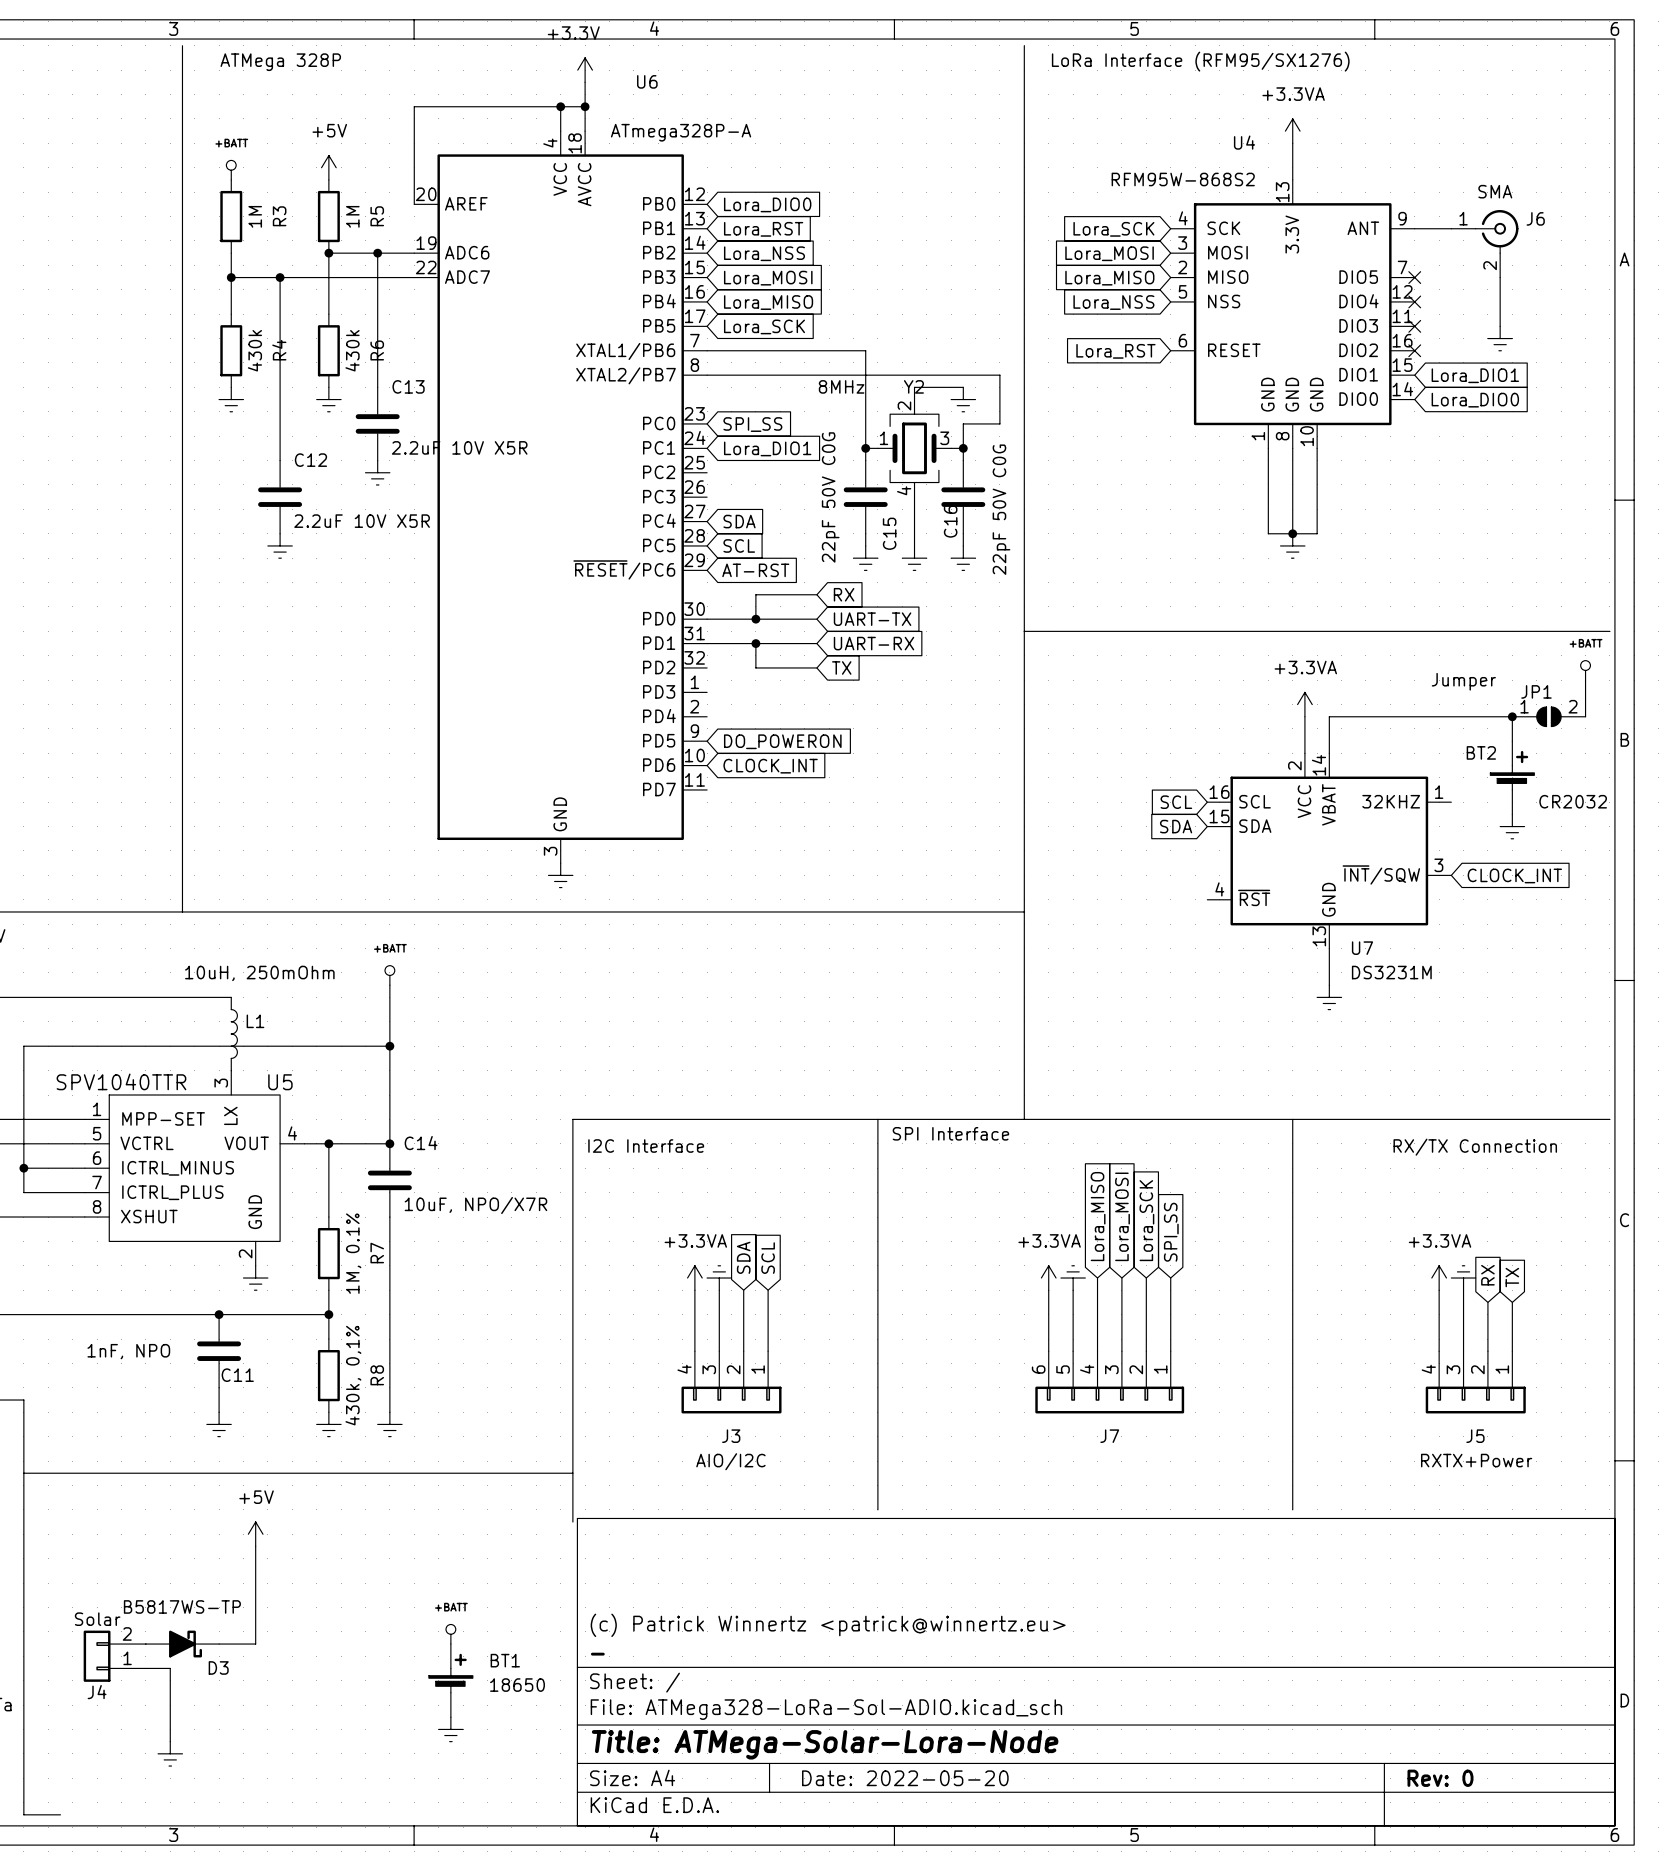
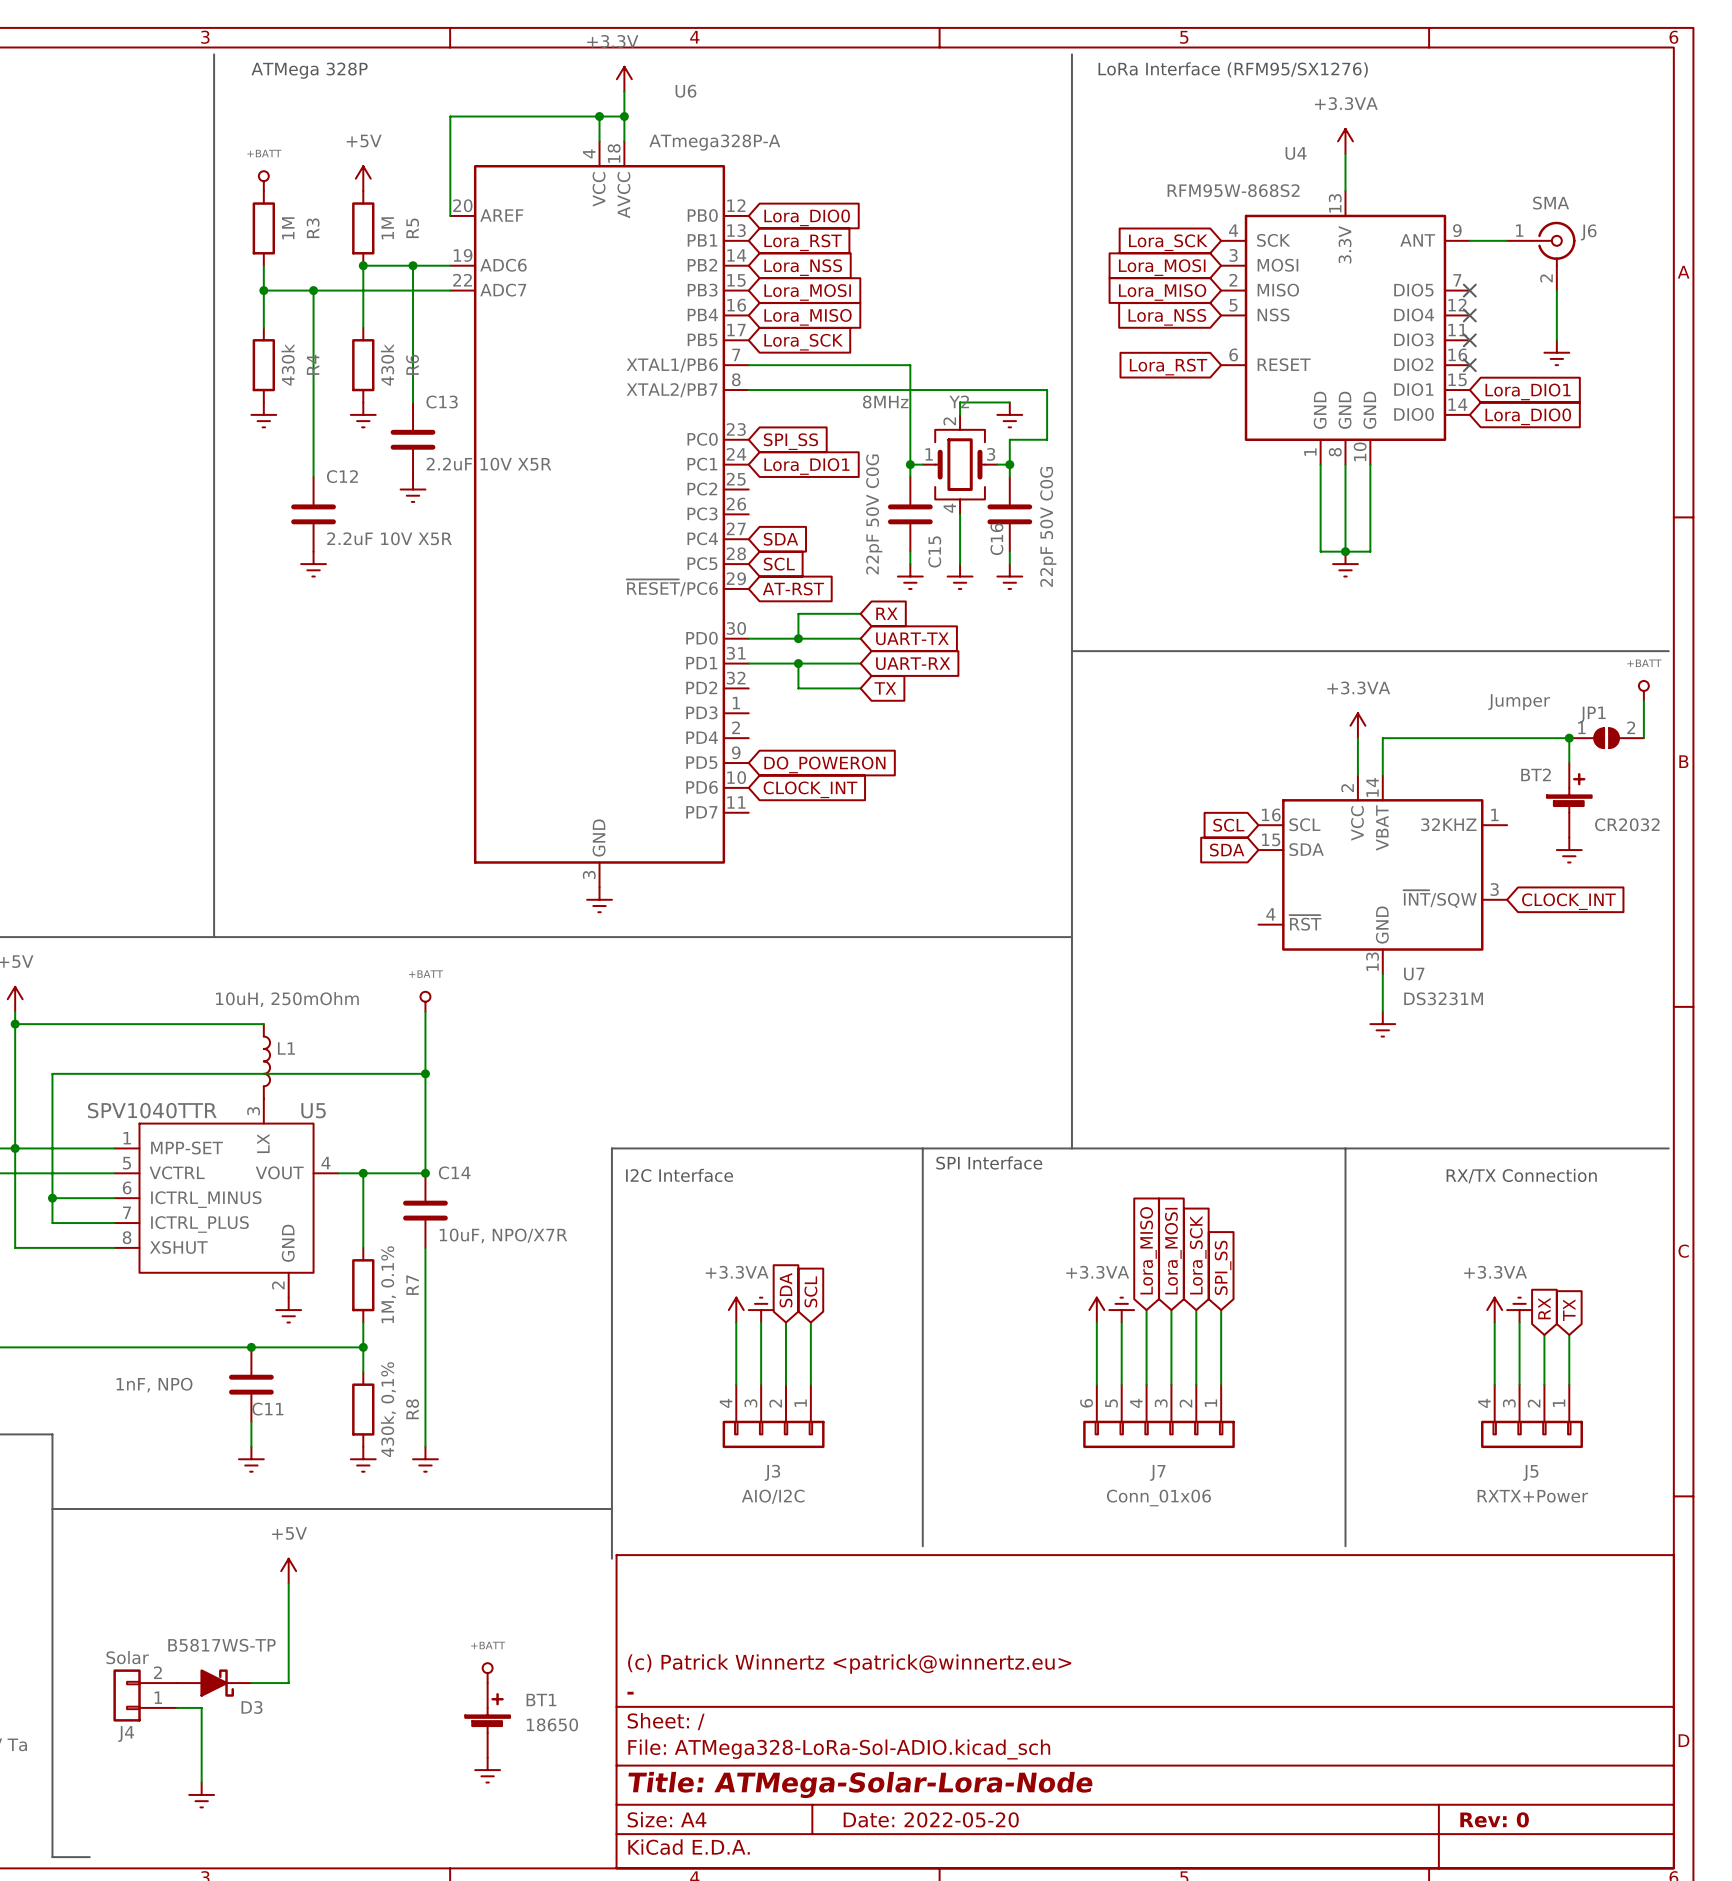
J7 value: none -> Conn_01x06 (1158, 1498)

